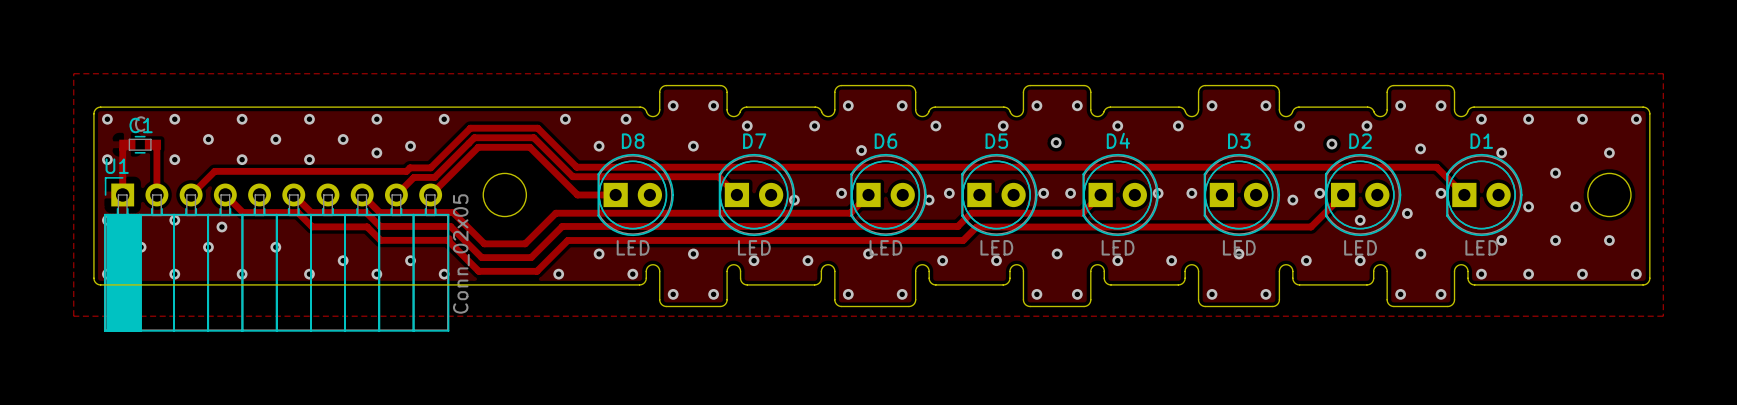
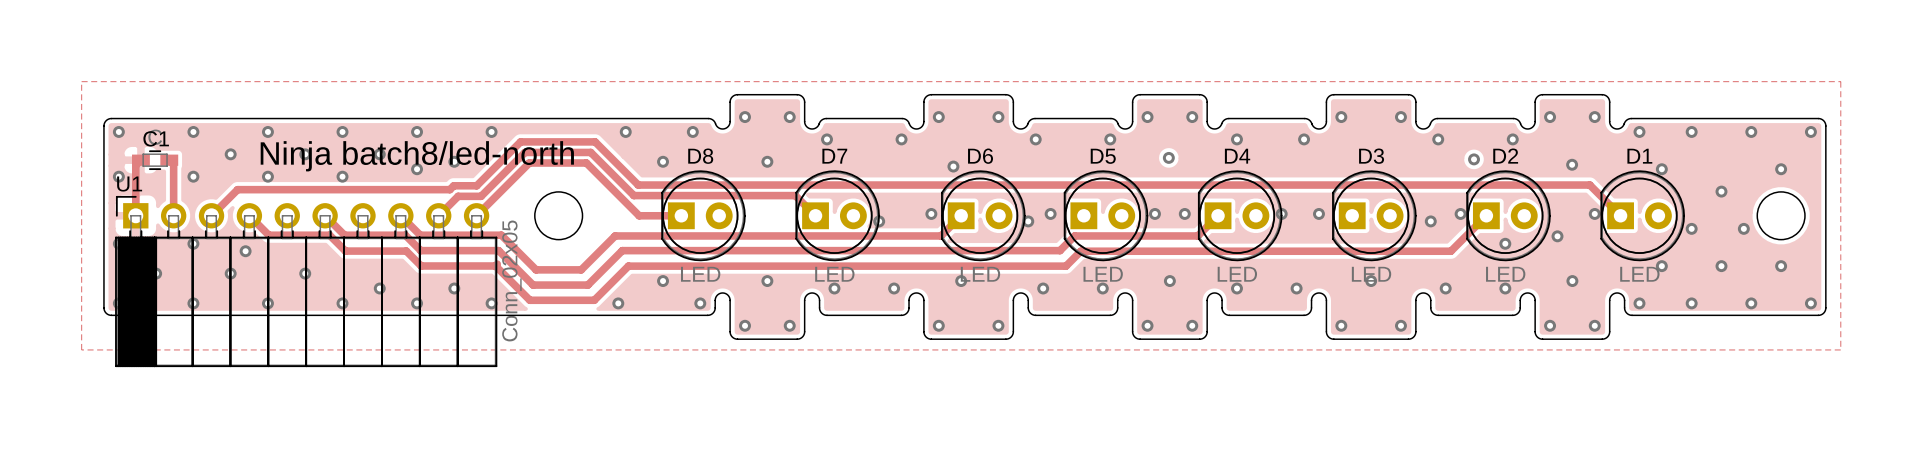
text: none -> Ninja batch8/led-north (417, 156)

